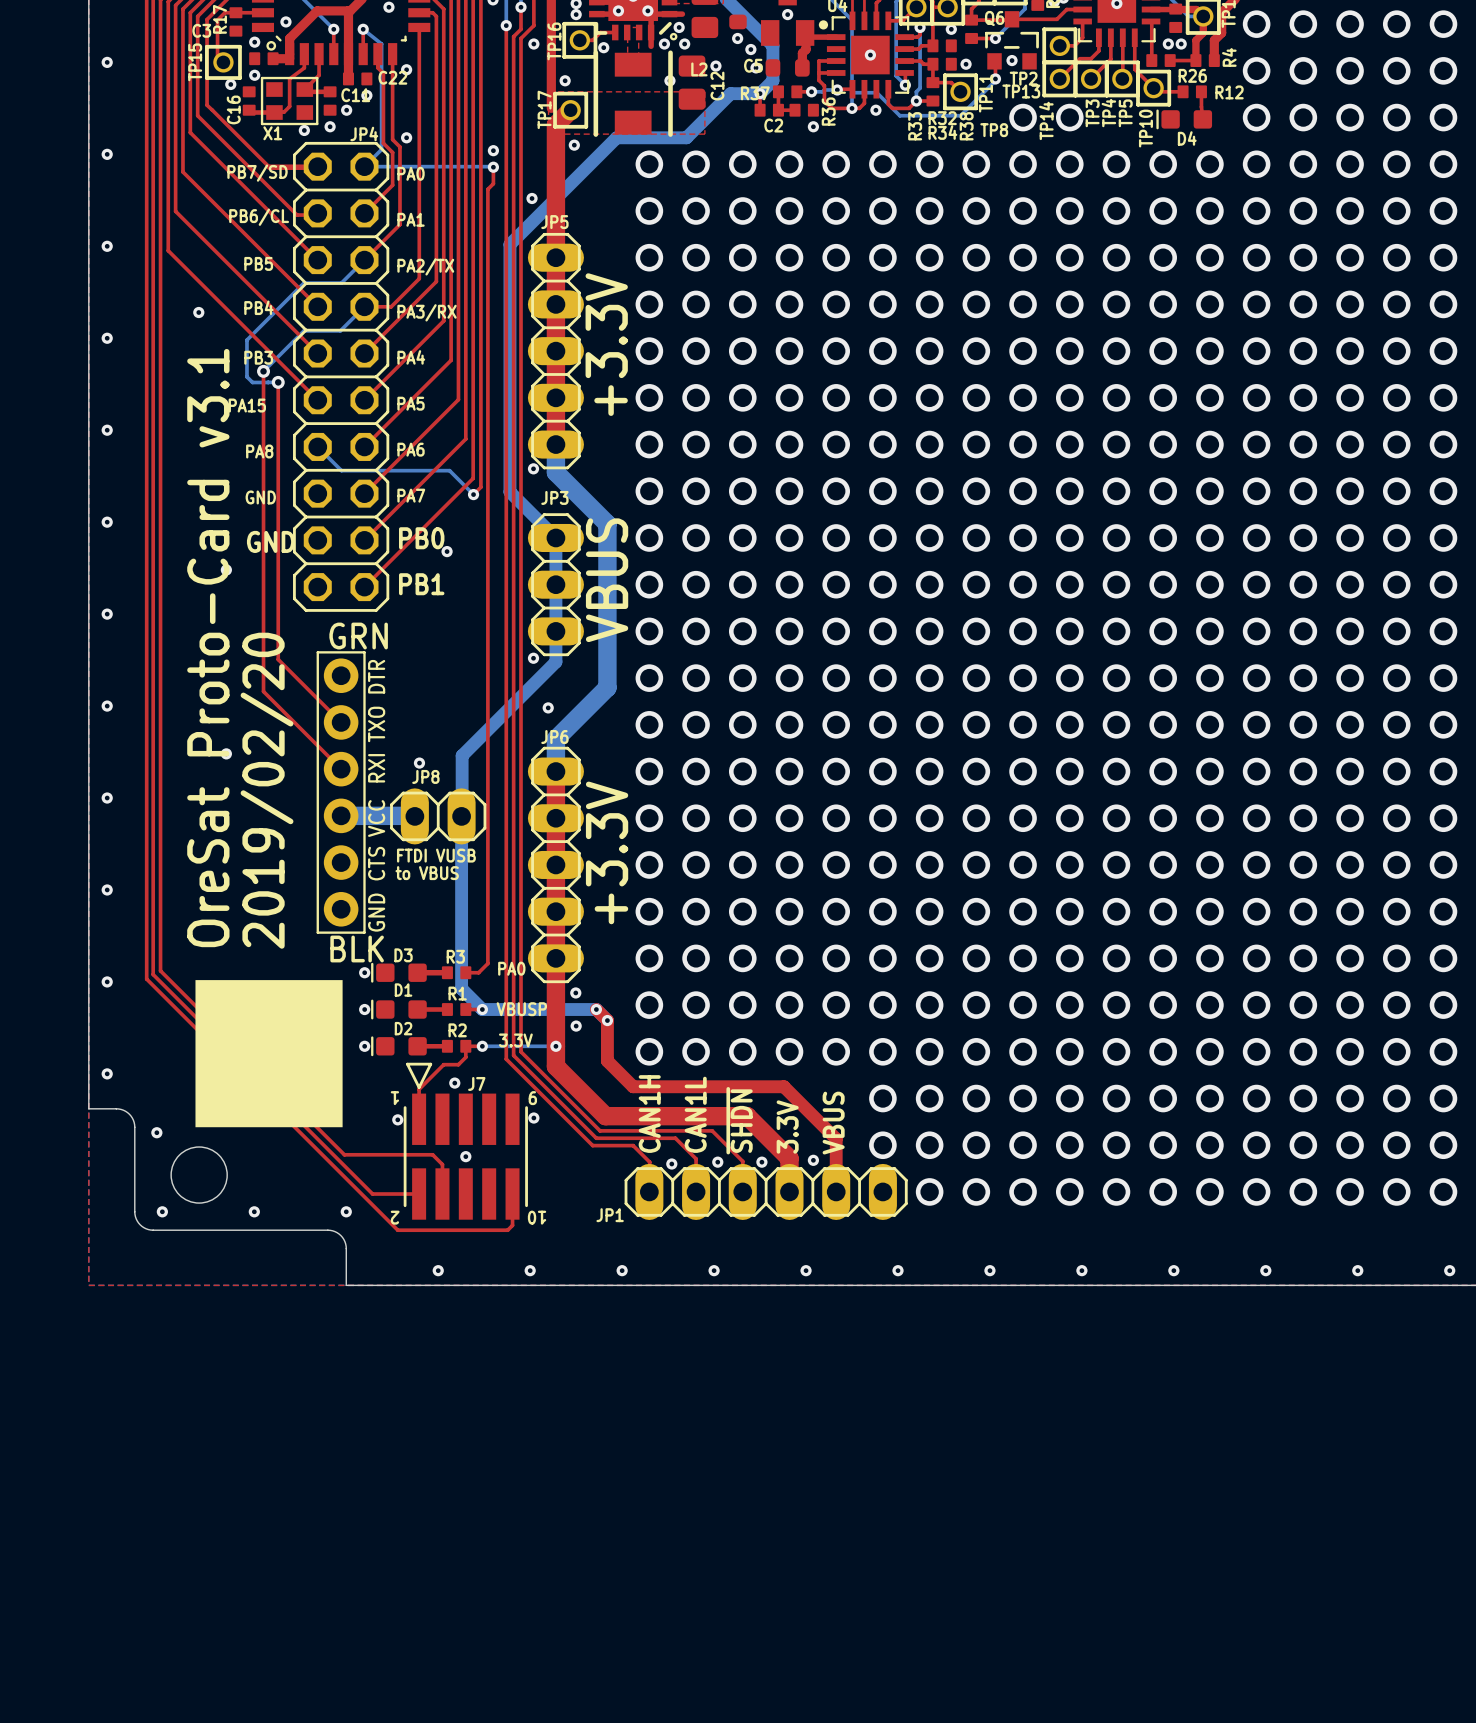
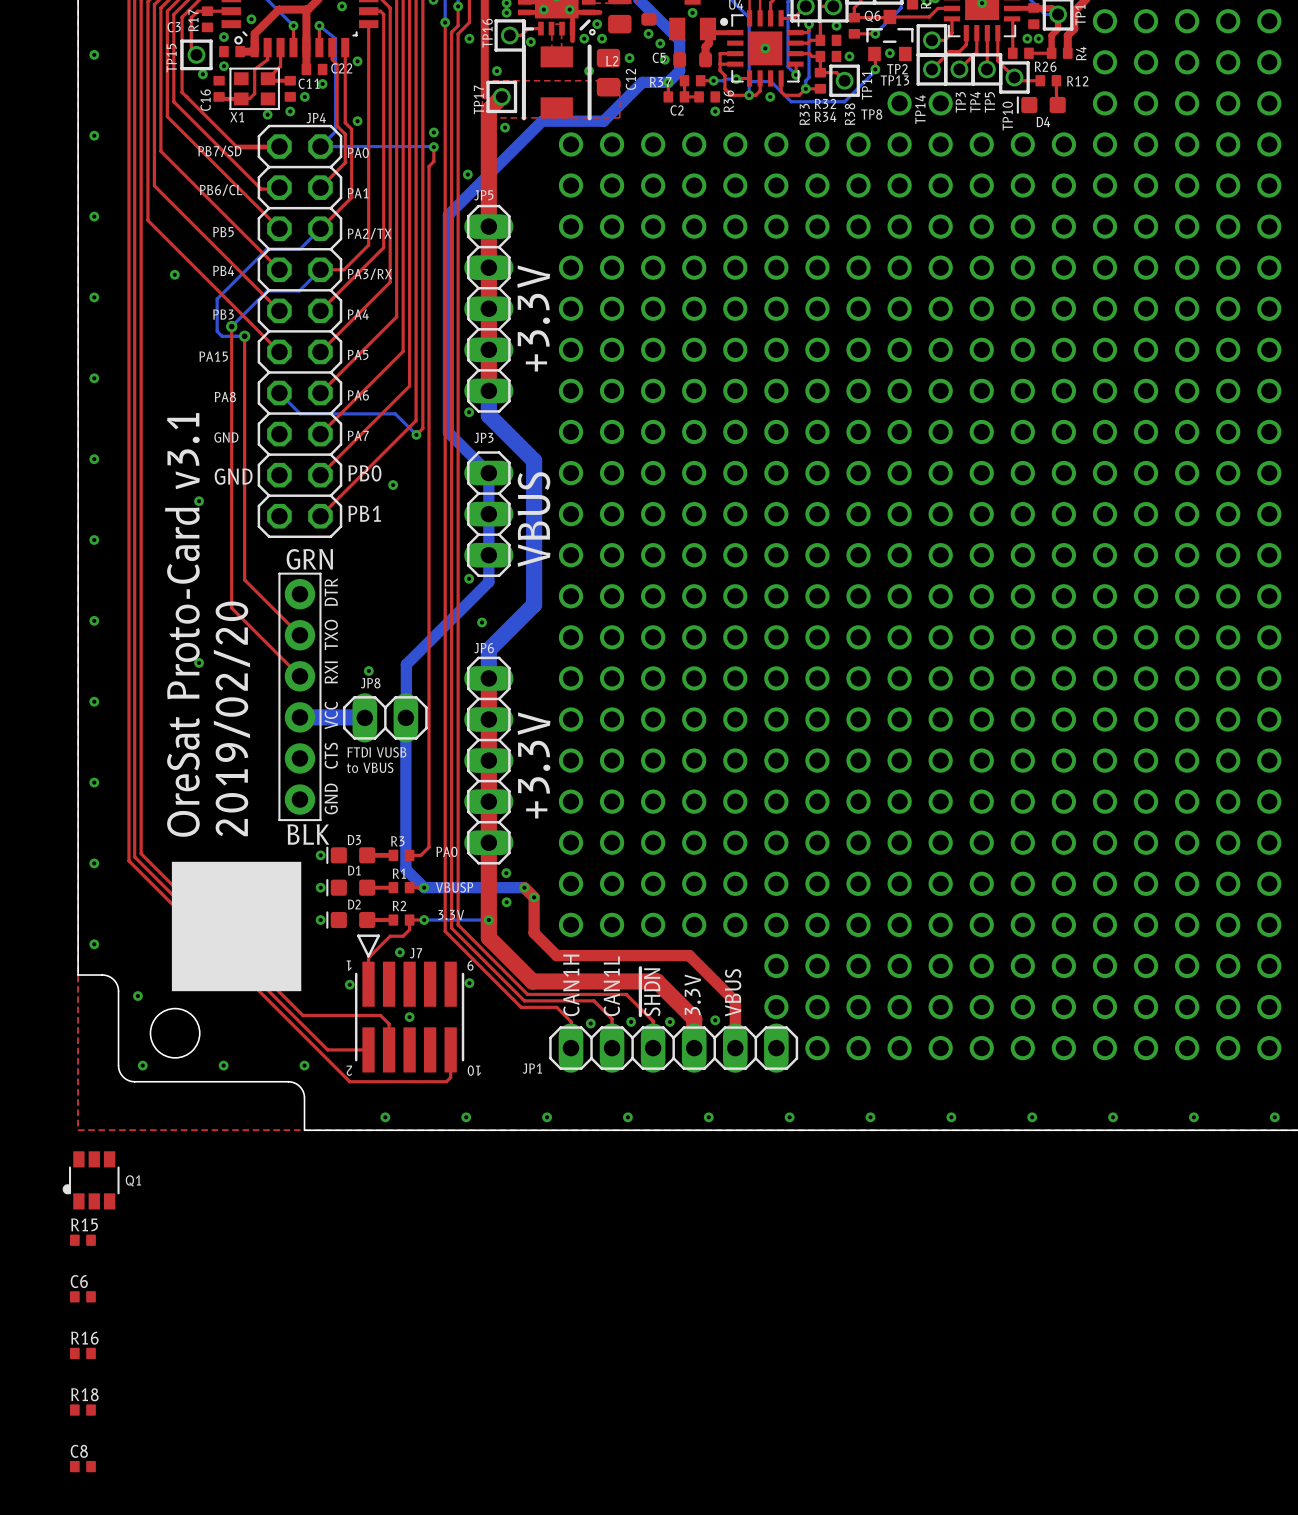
Q1: none -> (91, 1180)
R15: none -> (82, 1240)
C6: none -> (82, 1296)
R16: none -> (82, 1353)
R18: none -> (82, 1410)
C8: none -> (82, 1466)

